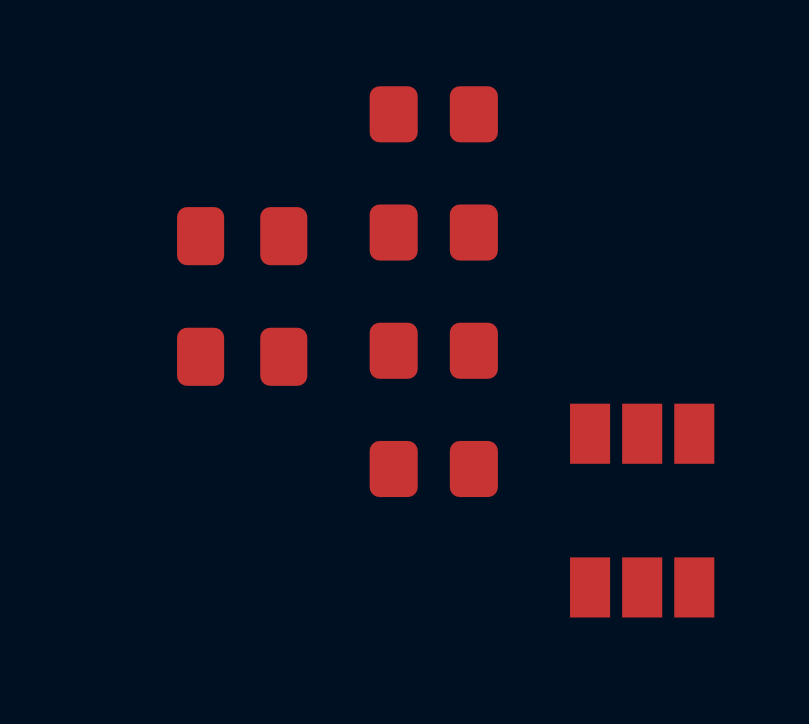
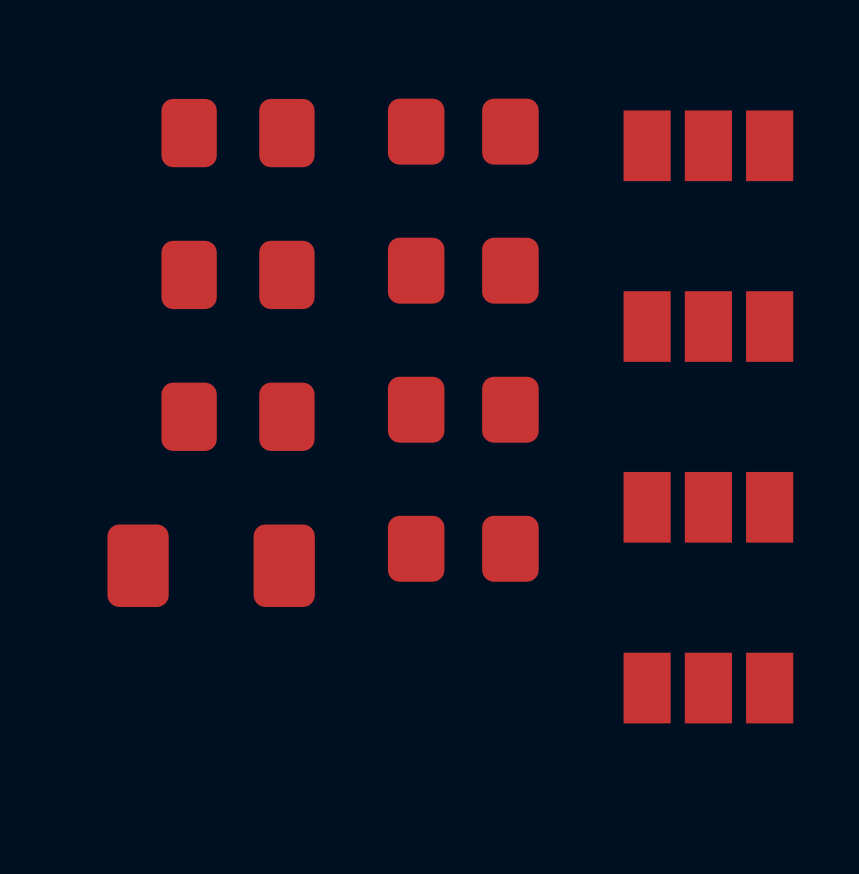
part: none -> (238, 133)
part: none -> (708, 145)
part: none -> (708, 326)
part: none -> (211, 565)

